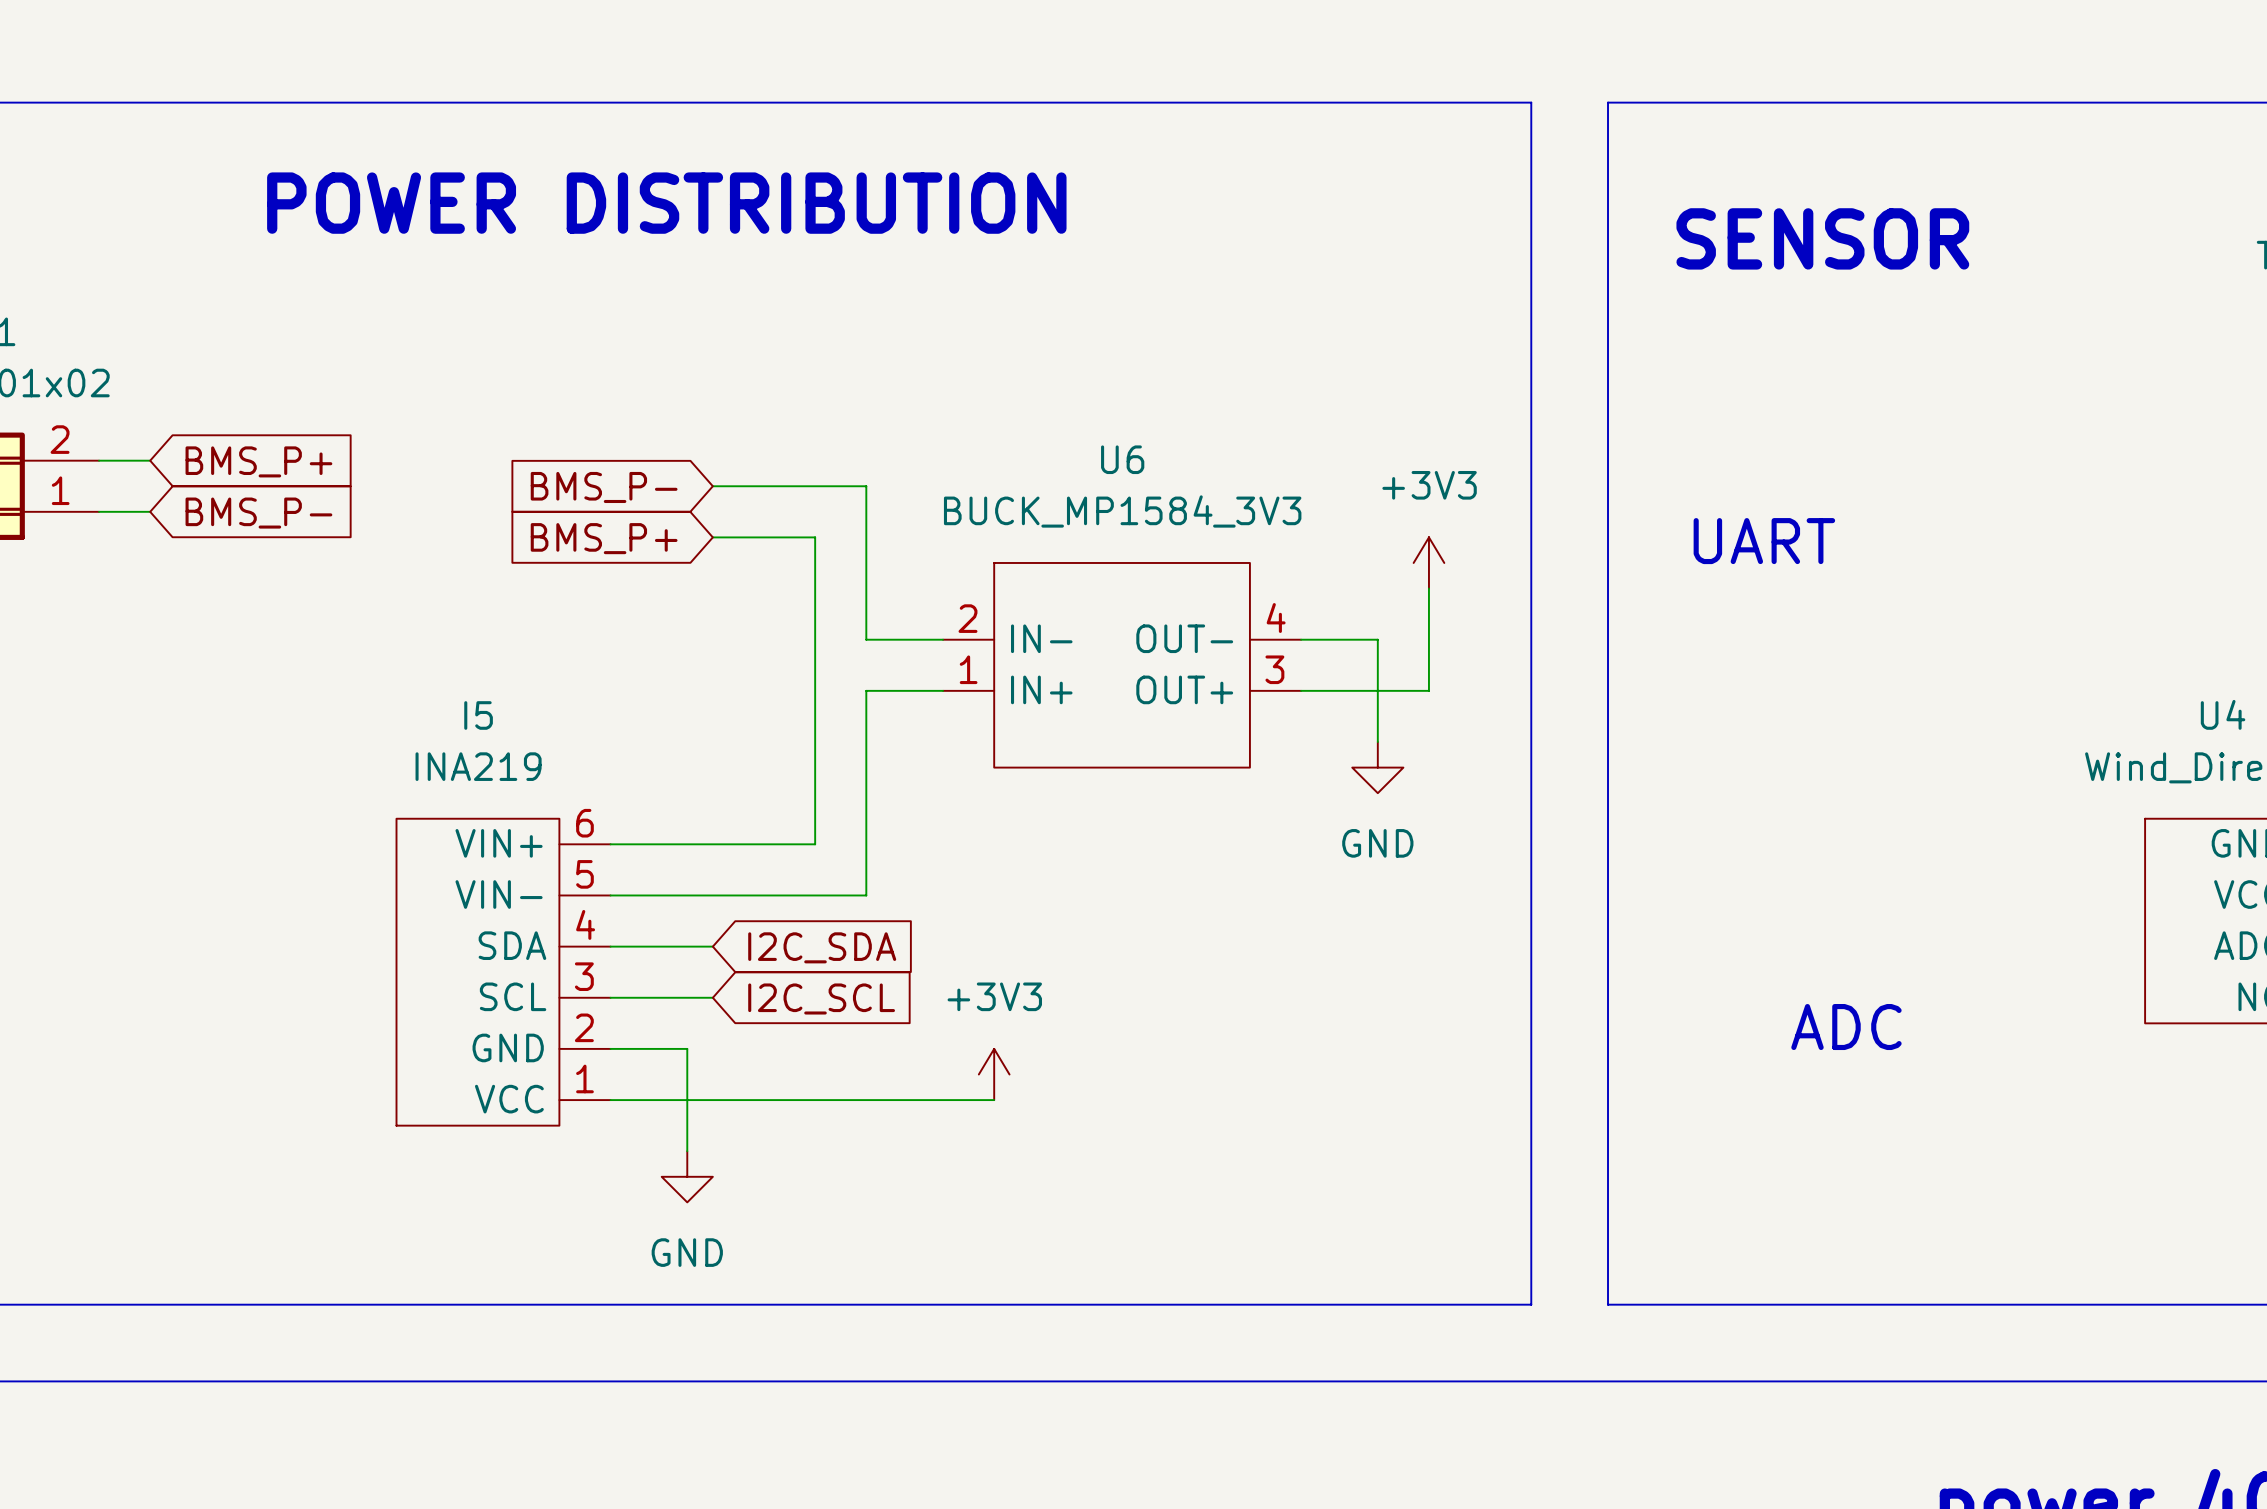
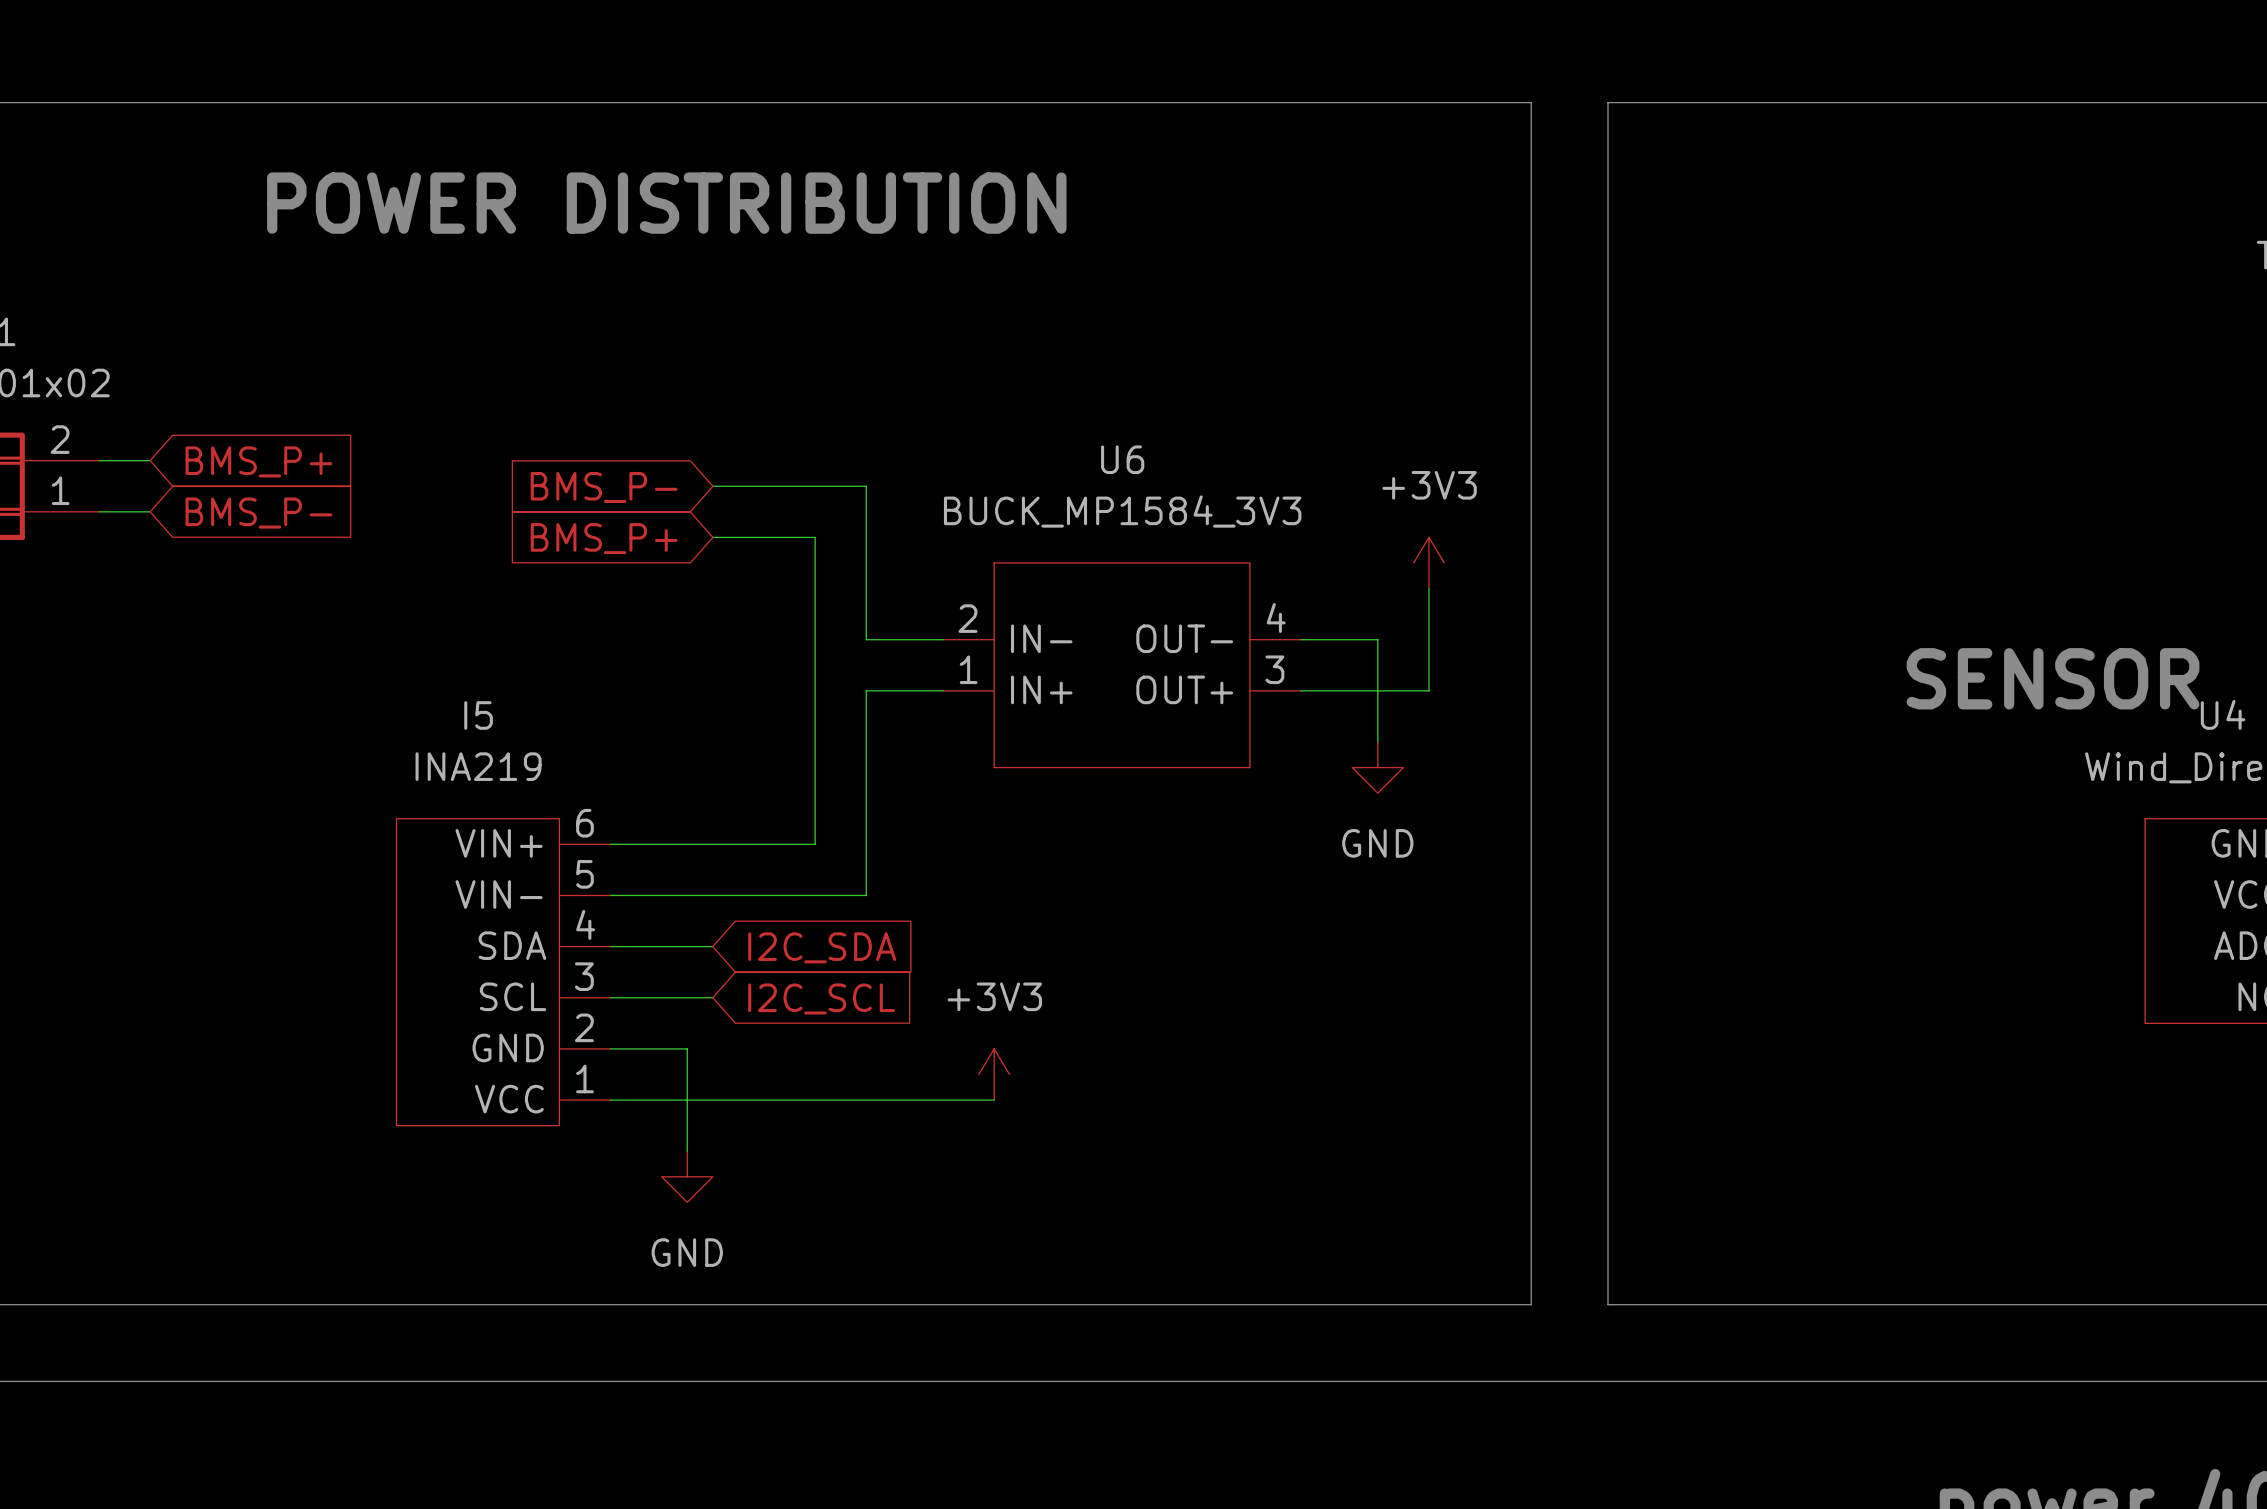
text position: SENSOR (1822, 238) -> SENSOR (2053, 678)
text: UART (1764, 541) -> none
text: ADC (1846, 1027) -> none

